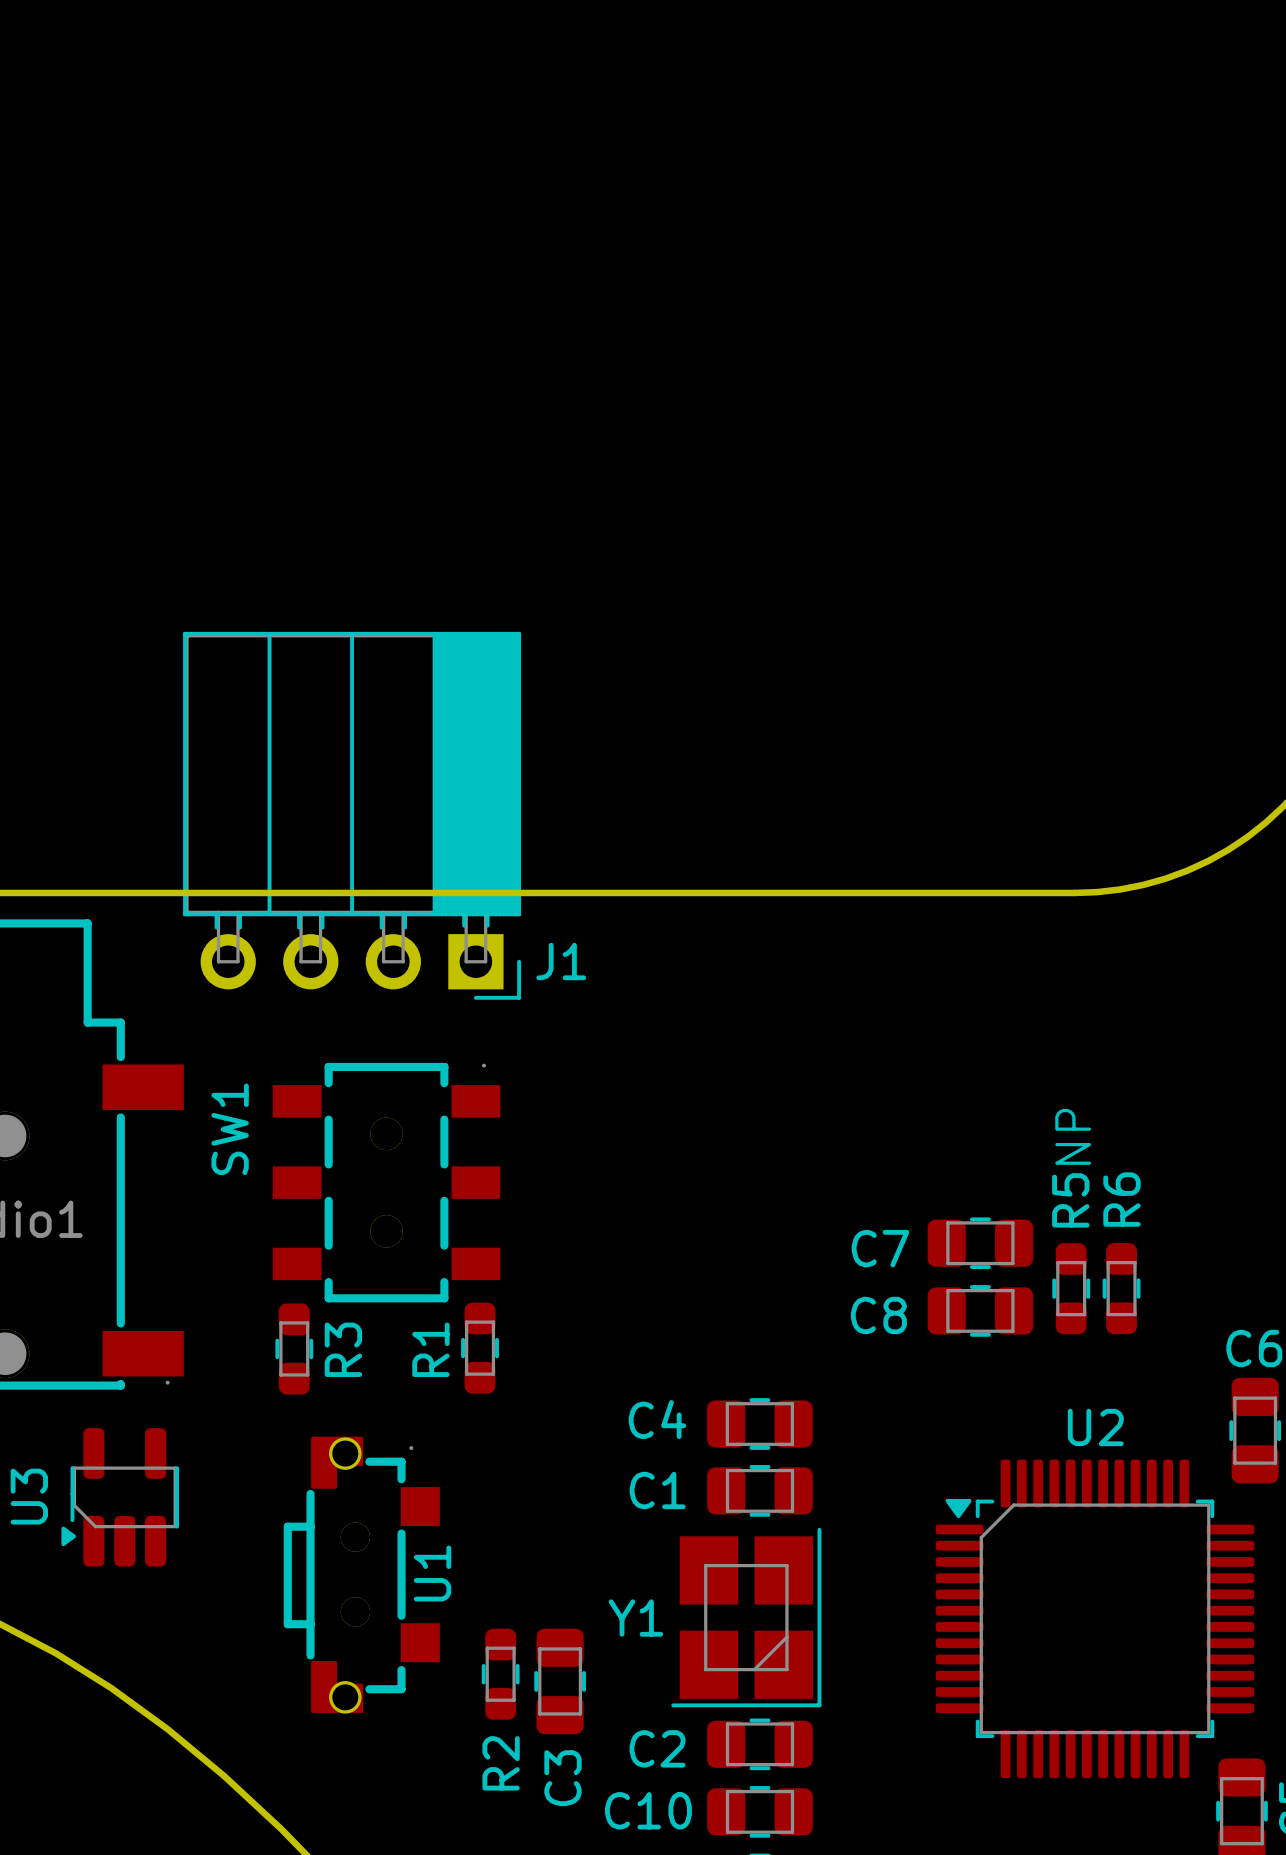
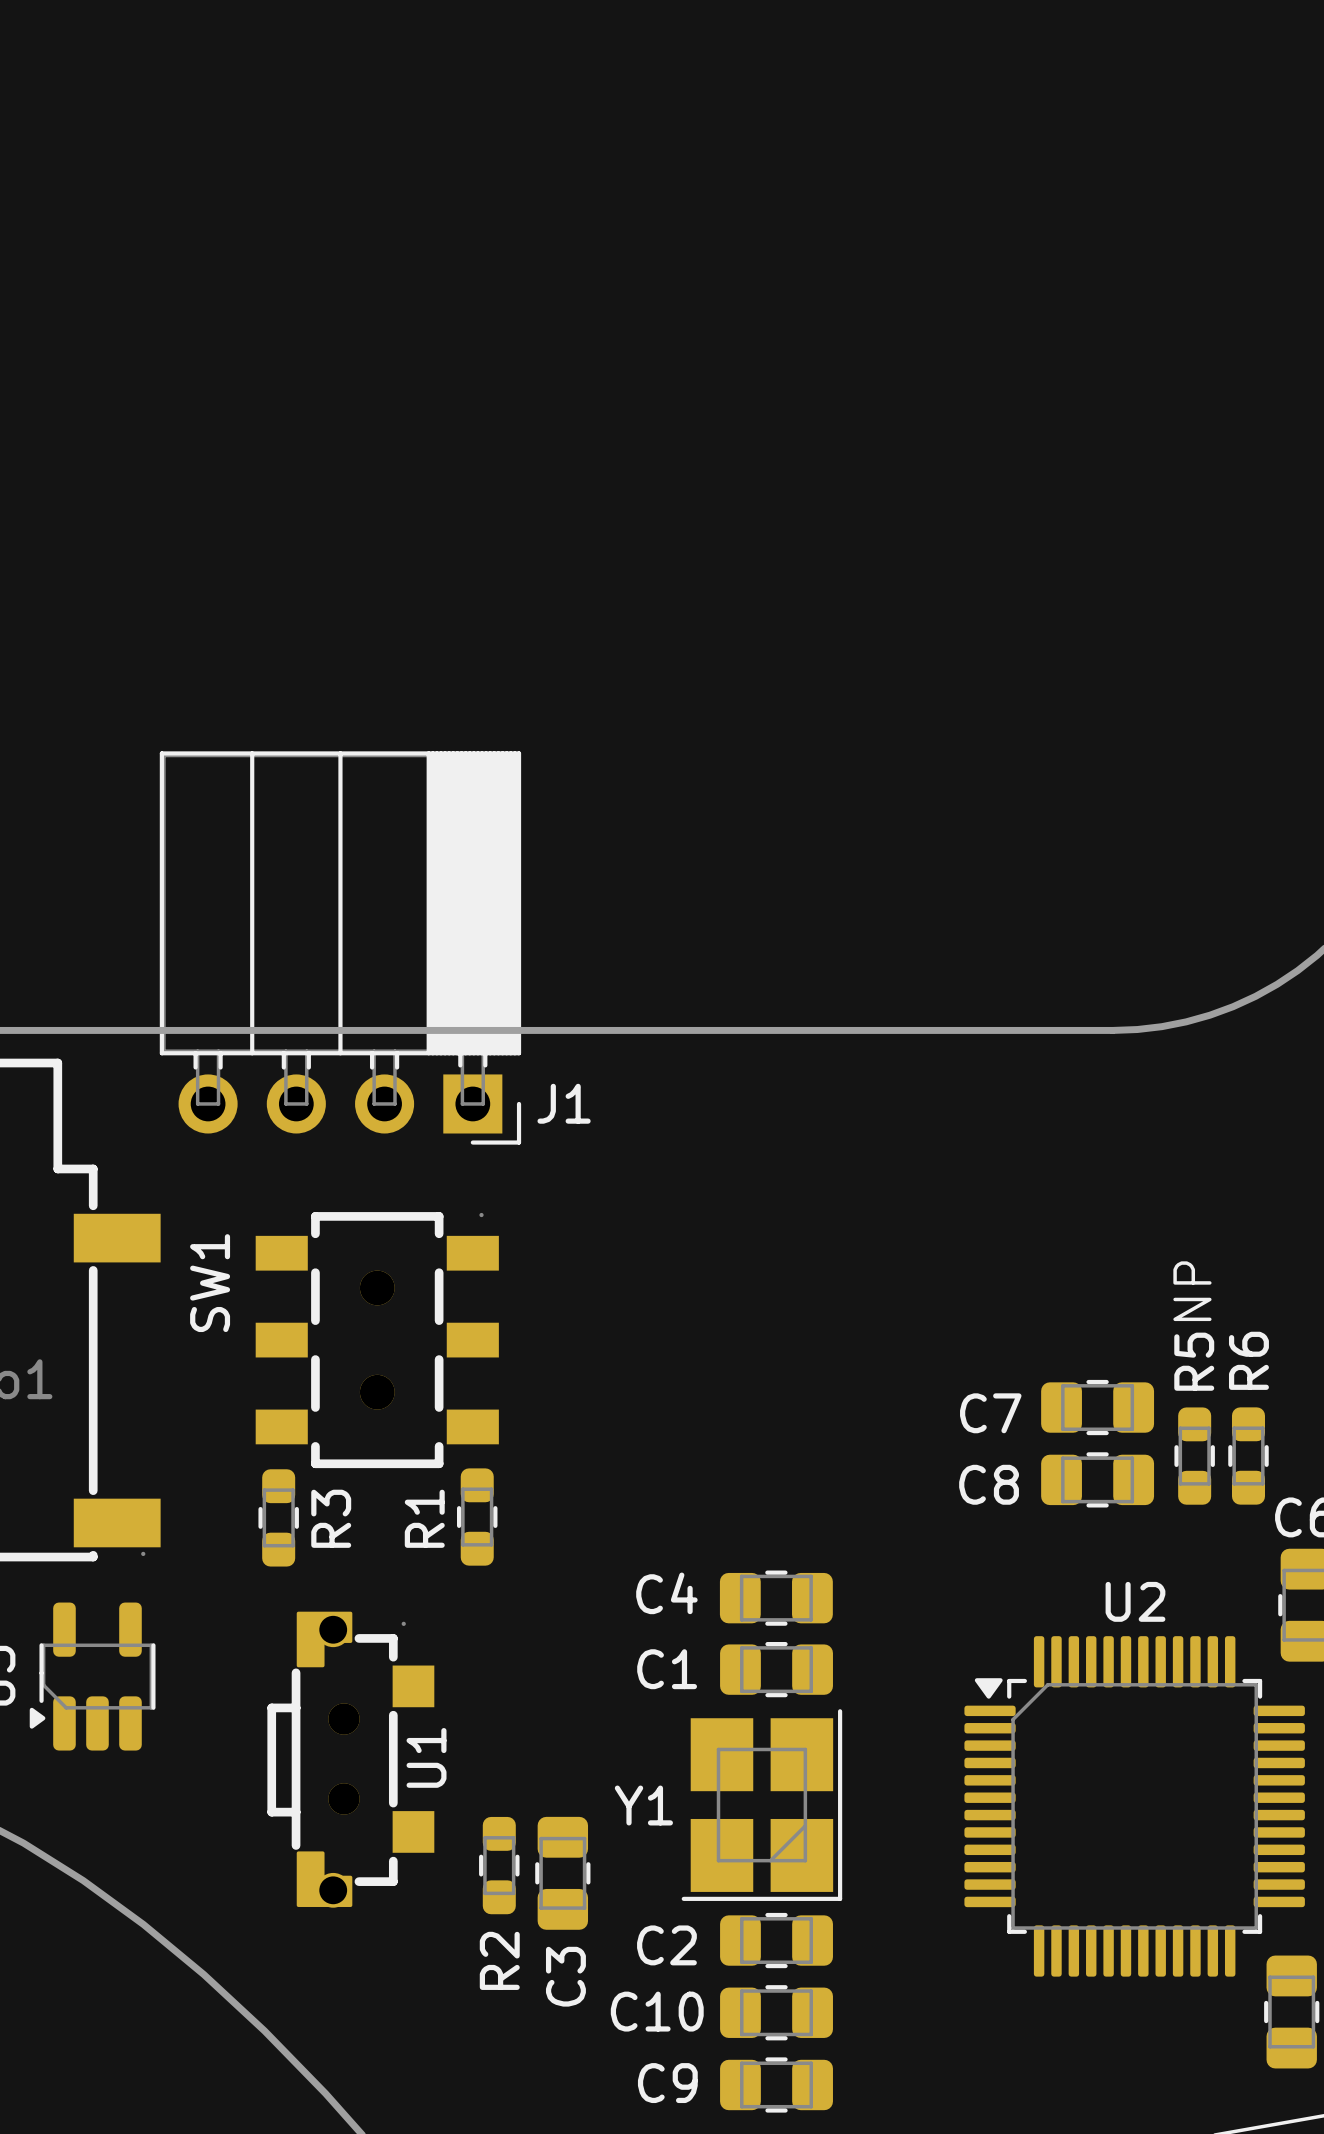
text position: NP (1073, 1136) -> NP (1192, 1291)
C7 position: (980, 1243) -> (1097, 1407)
R5 position: (1071, 1288) -> (1194, 1456)
R6 position: (1121, 1288) -> (1248, 1456)
C8 position: (980, 1310) -> (1097, 1479)

